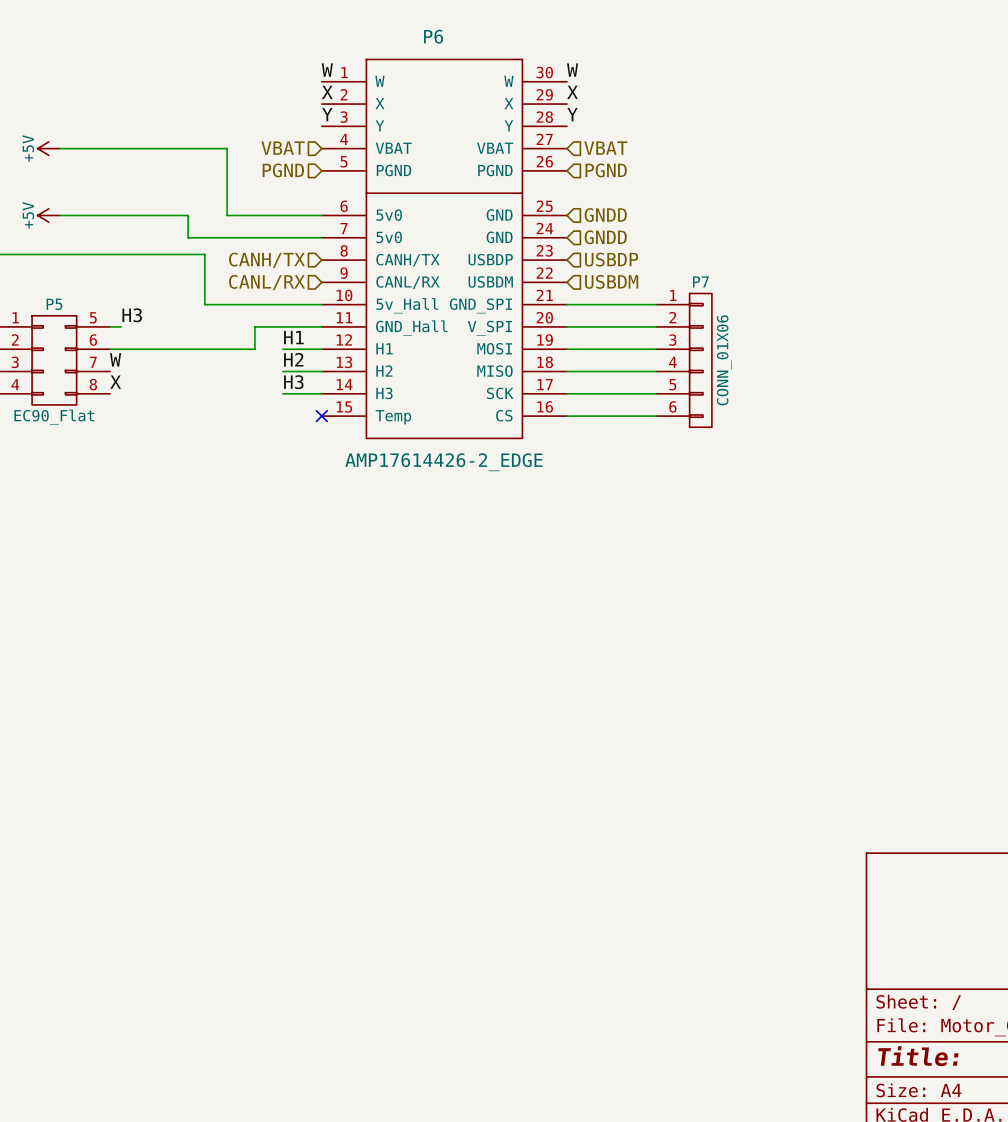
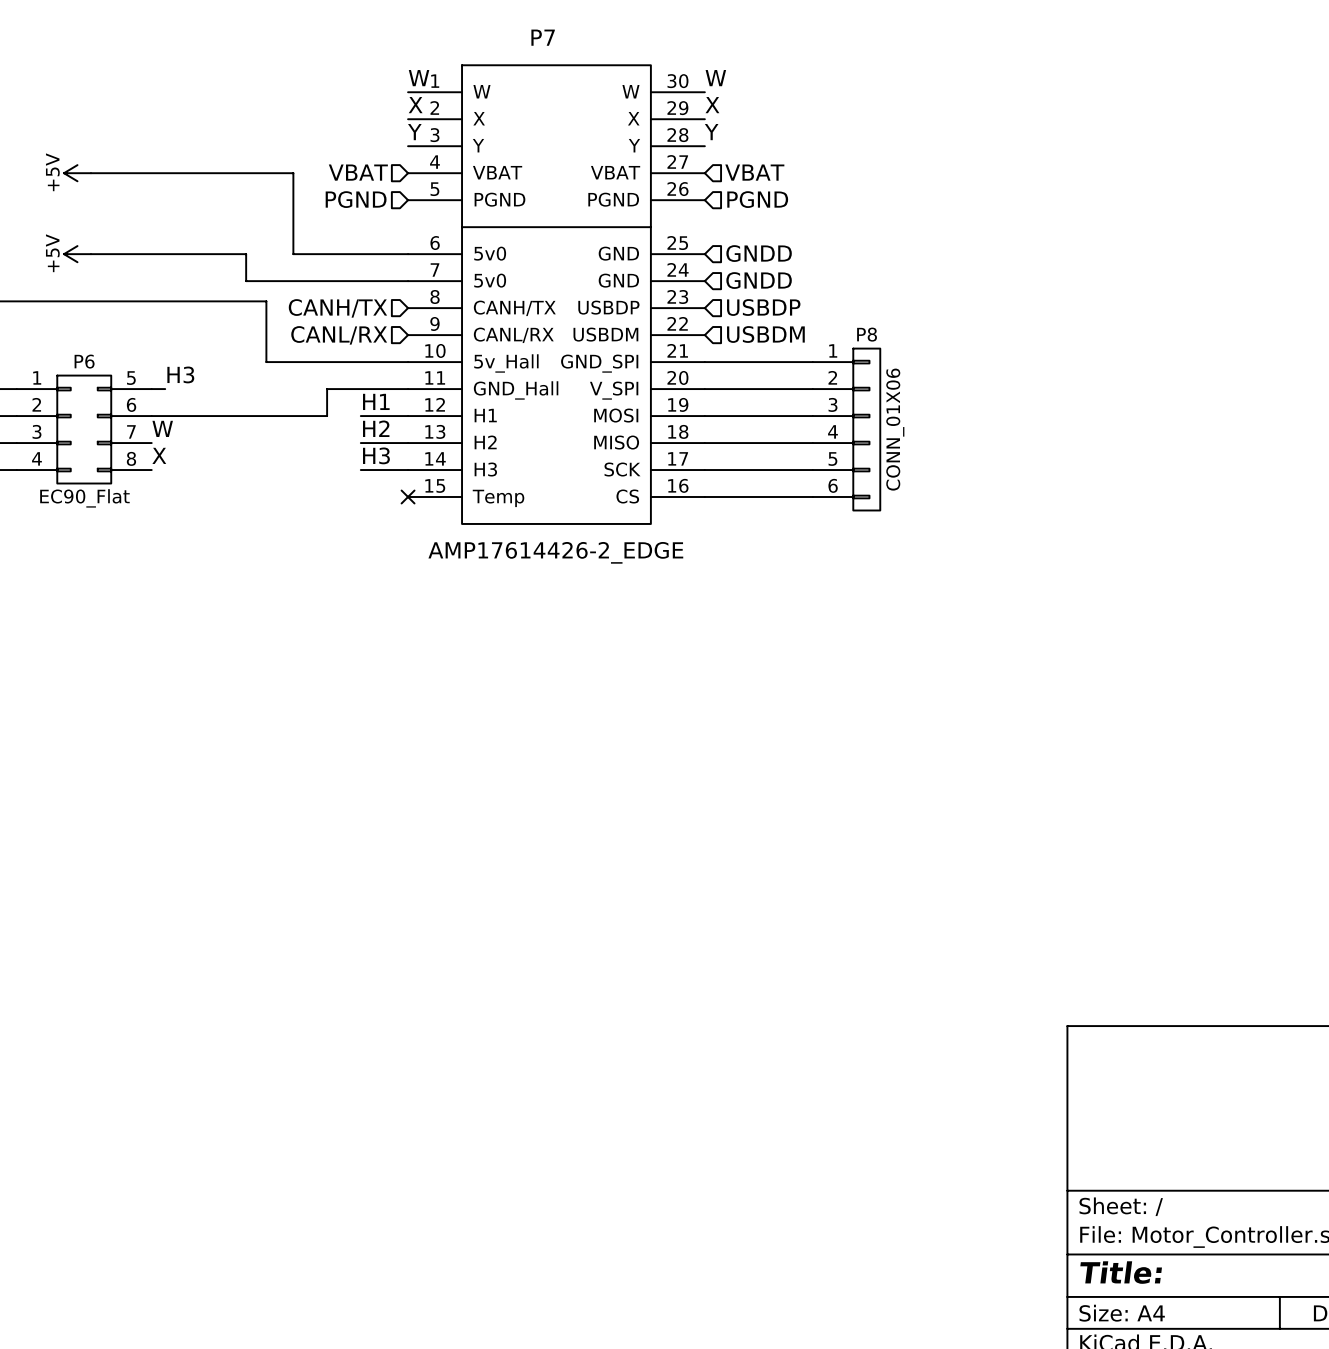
P6 name: P6 (433, 36) -> P7 (543, 37)
P7 name: P7 (700, 281) -> P8 (867, 334)
P5 name: P5 (54, 304) -> P6 (84, 361)

